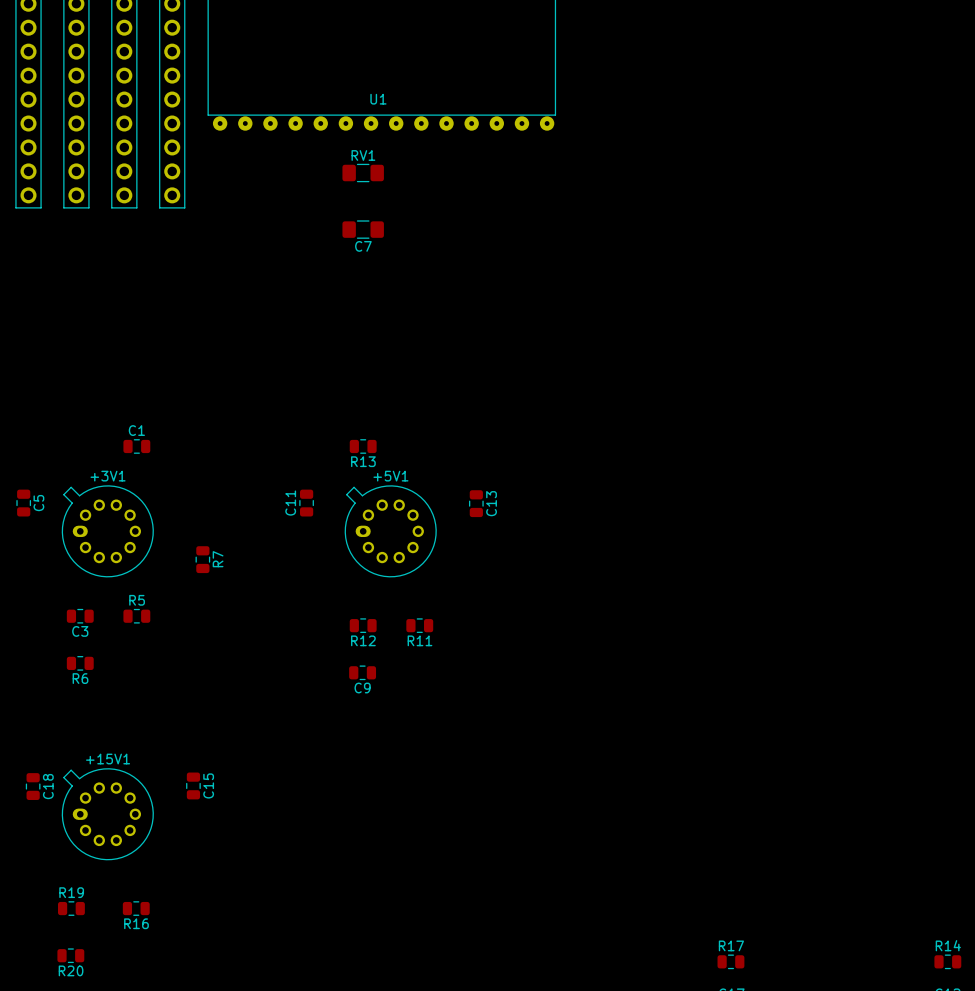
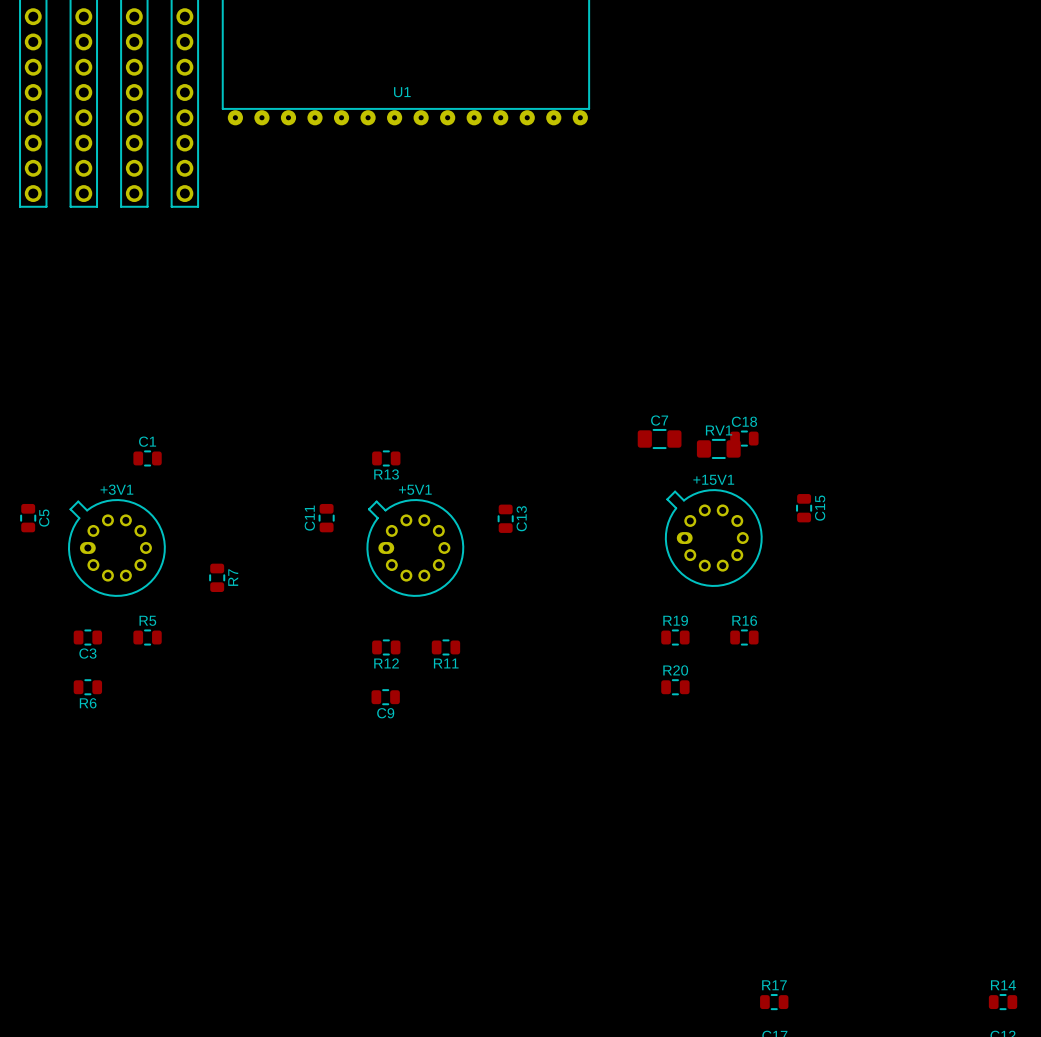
RV1 position: (363, 173) -> (718, 448)
C7 position: (363, 229) -> (659, 439)
C7 name position: C7 (363, 246) -> C7 (659, 420)
C15 position: (193, 785) -> (804, 508)
C18 rotation: 0° (33, 786) -> 90° clockwise (744, 438)
C18 position: (33, 786) -> (744, 438)
C18 name position: C18 (48, 786) -> C18 (744, 421)
+15V1 position: (107, 814) -> (713, 538)
R19 position: (71, 908) -> (675, 637)
R16 position: (136, 908) -> (744, 637)
R16 name position: R16 (136, 923) -> R16 (744, 620)
R20 position: (70, 955) -> (675, 687)
R20 name position: R20 (71, 970) -> R20 (675, 670)

